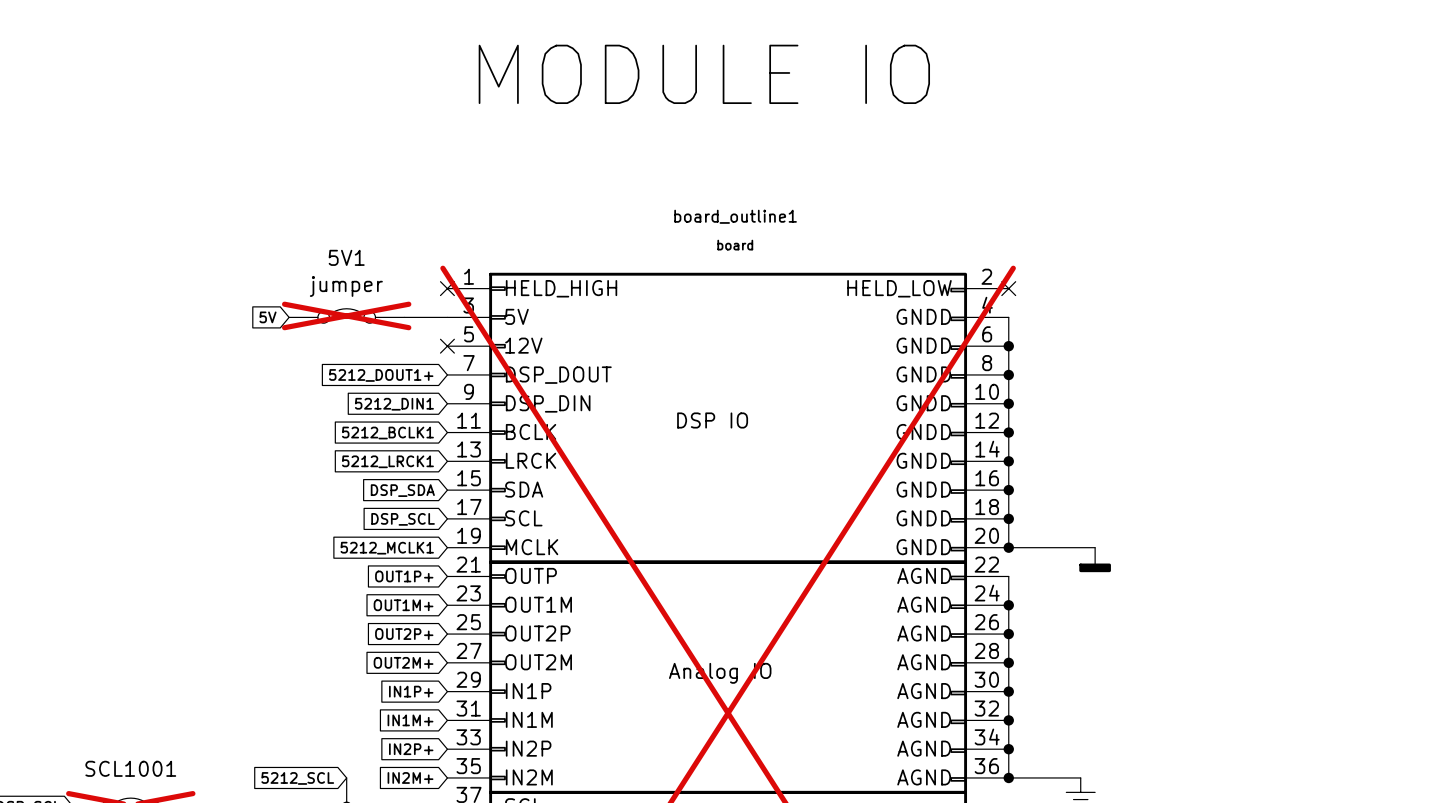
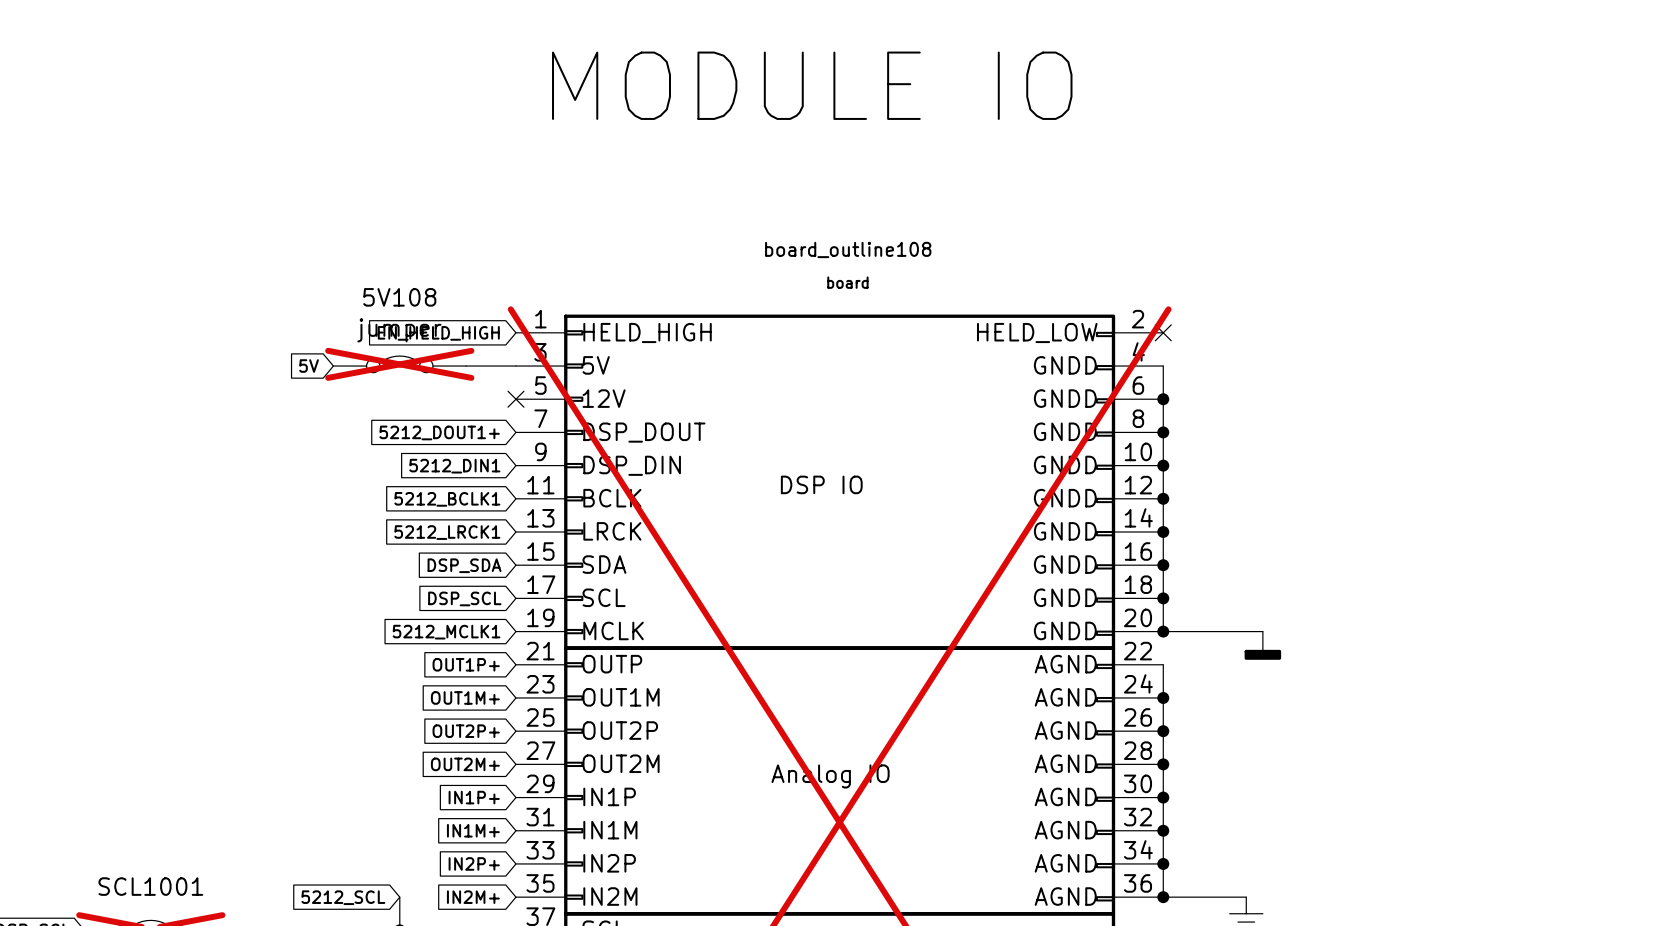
board_outline1 name: board_outline1 (735, 216) -> board_outline108 (848, 249)
5V1 name: 5V1 (346, 257) -> 5V108 (399, 297)
no-connect mark: (447, 288) -> none
global label: none -> EN_HELD_HIGH (438, 333)

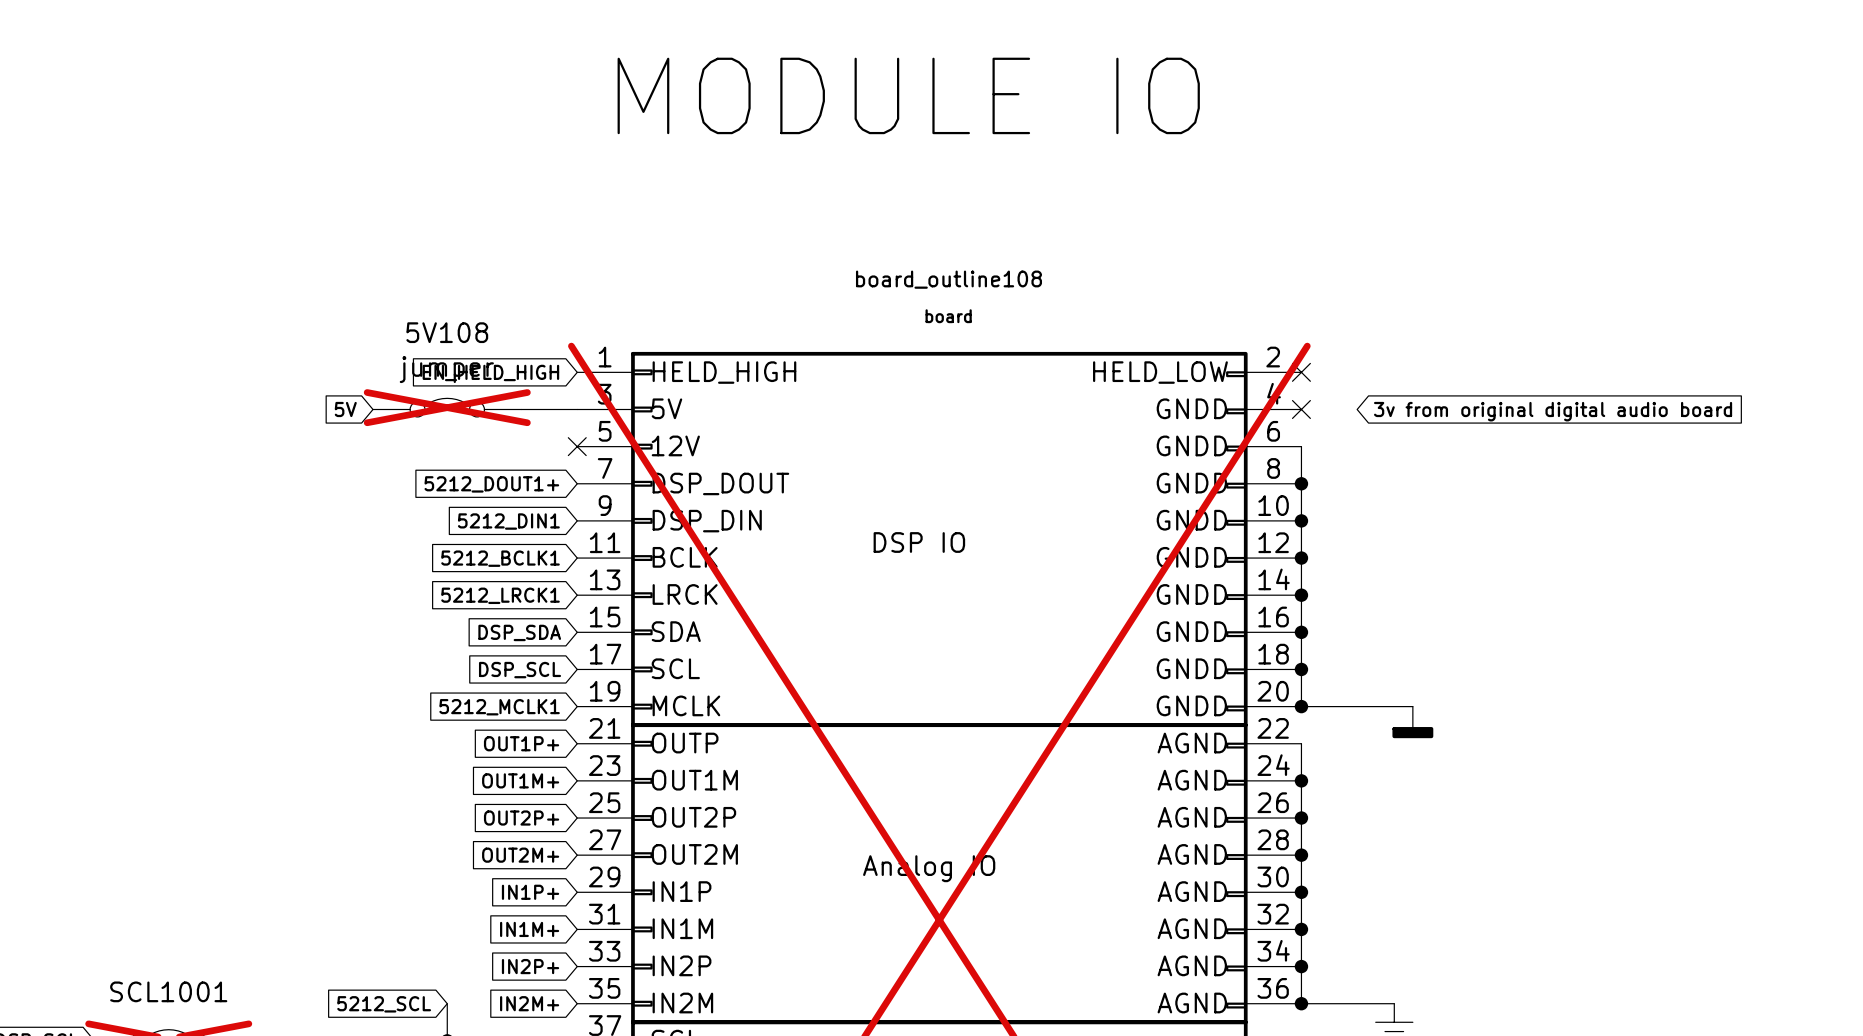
wire: (1163, 366) (1163, 399) -> none
no-connect mark: none -> (1301, 409)
global label: none -> 3v from original digital audio board (1553, 411)
junction: (1163, 399) -> none

